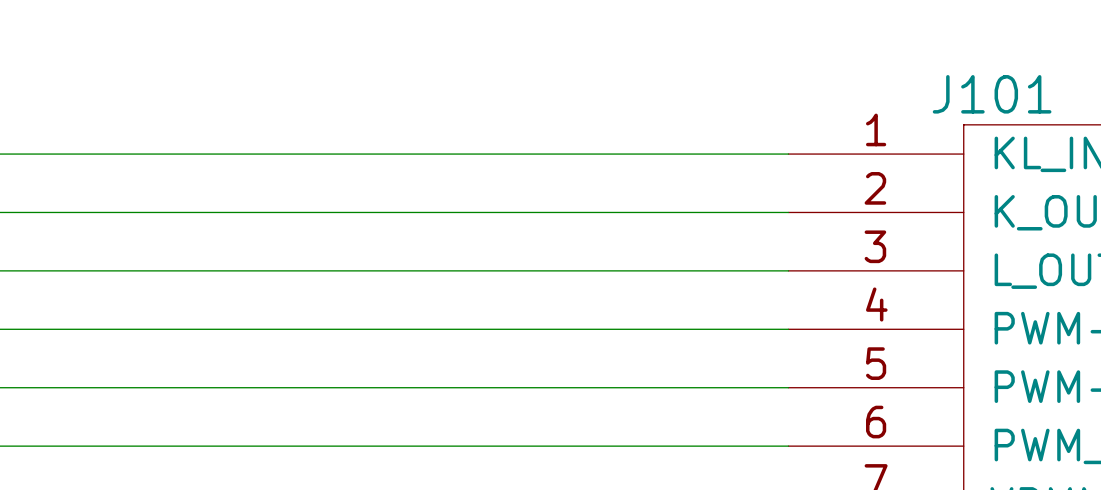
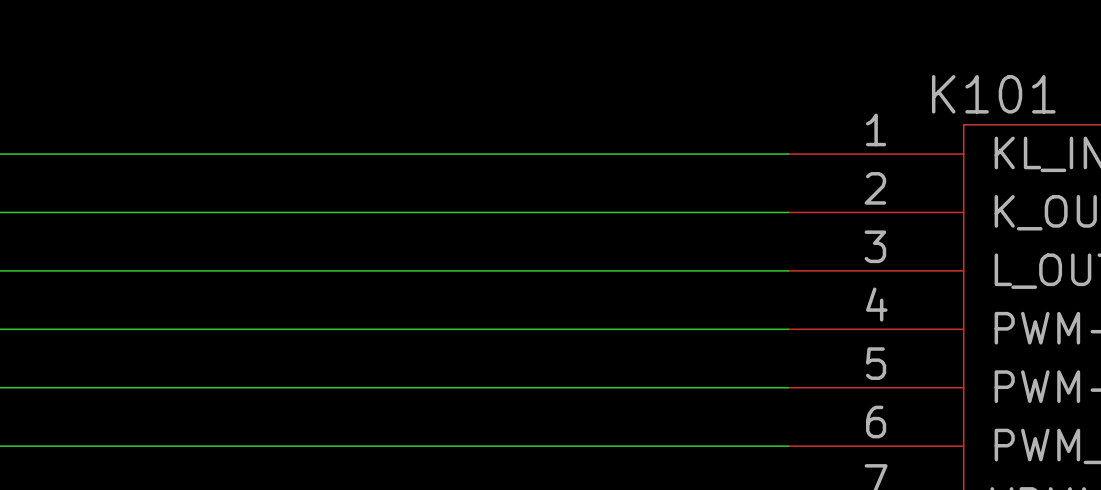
J101 name: J101 (992, 94) -> K101 (993, 94)

